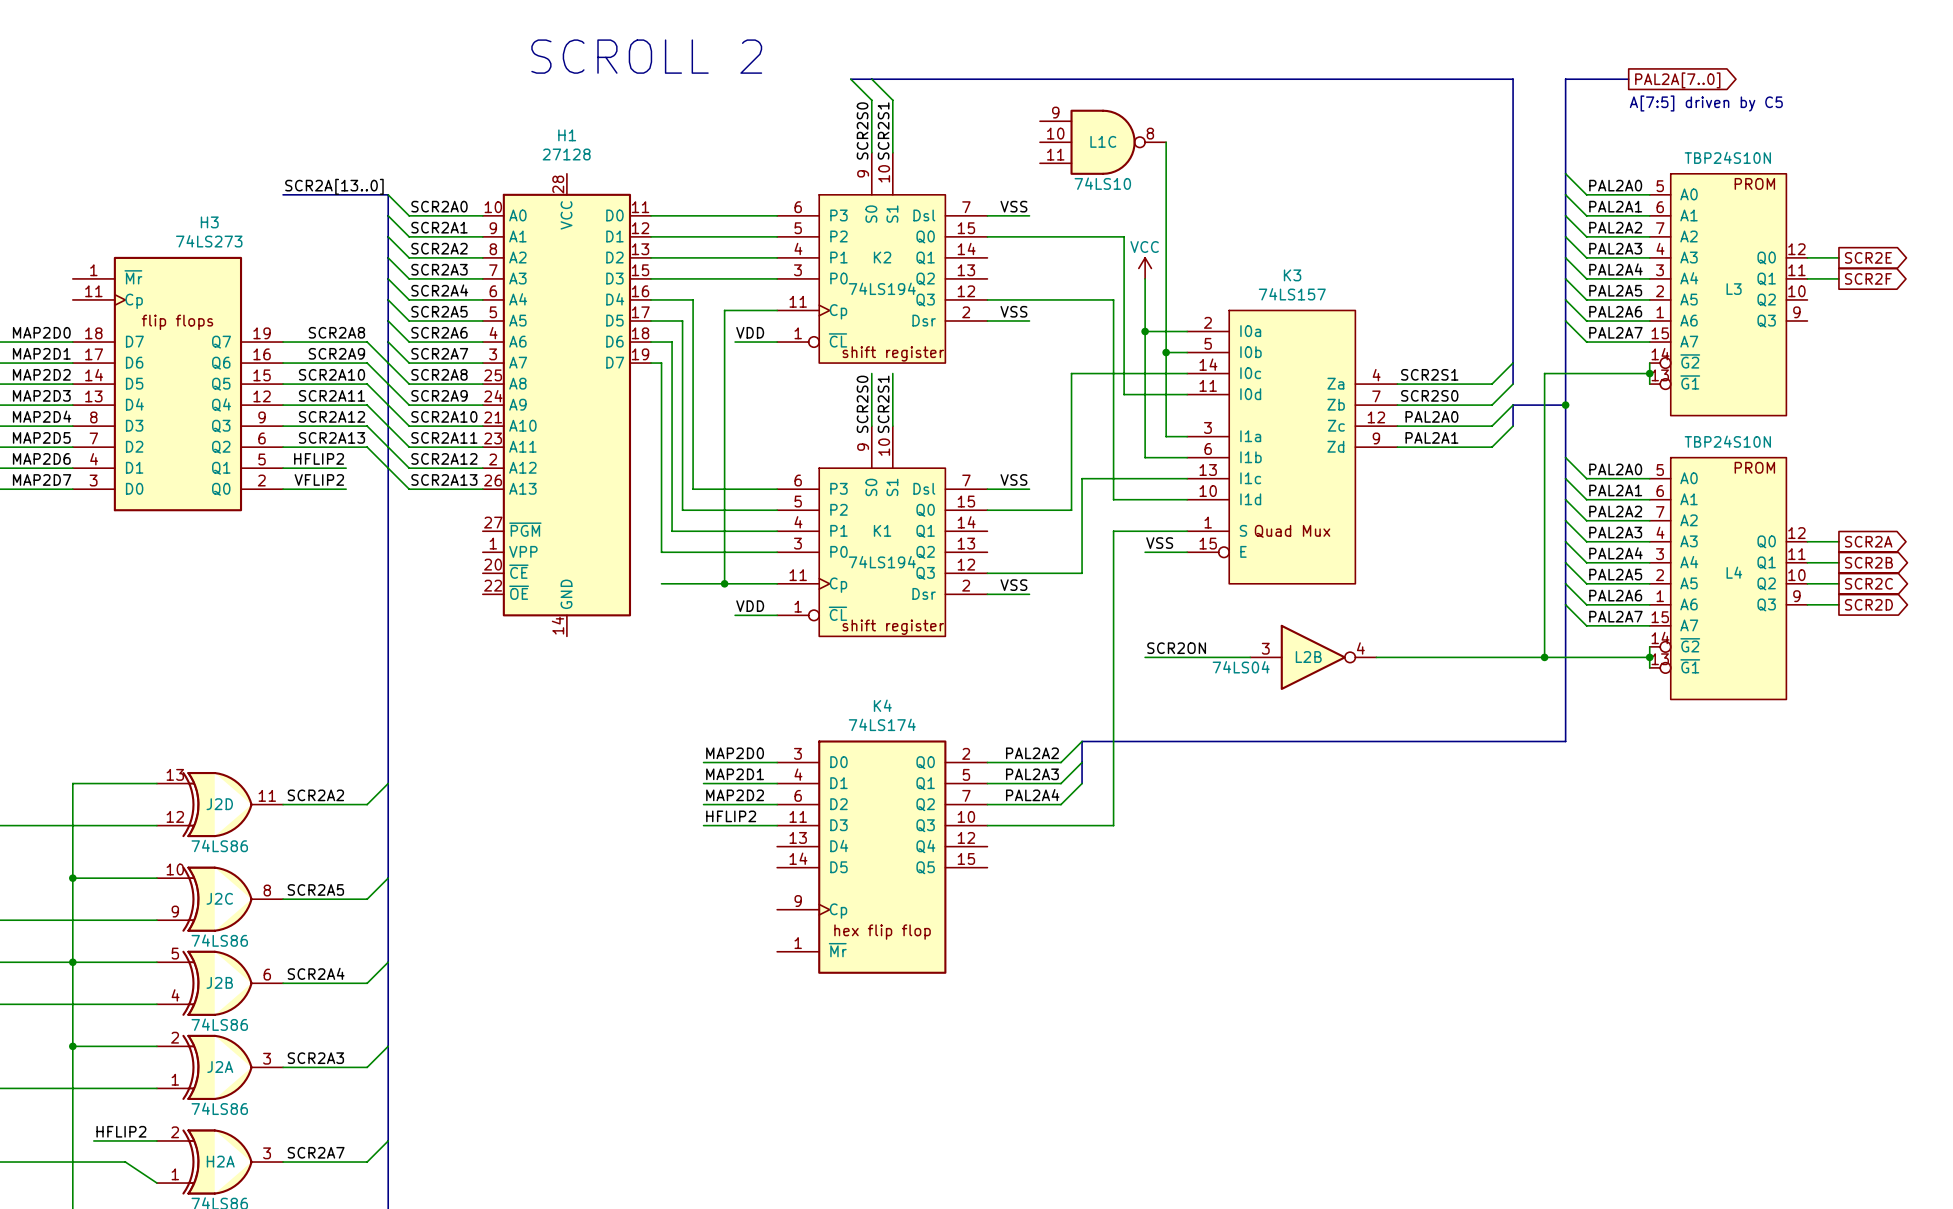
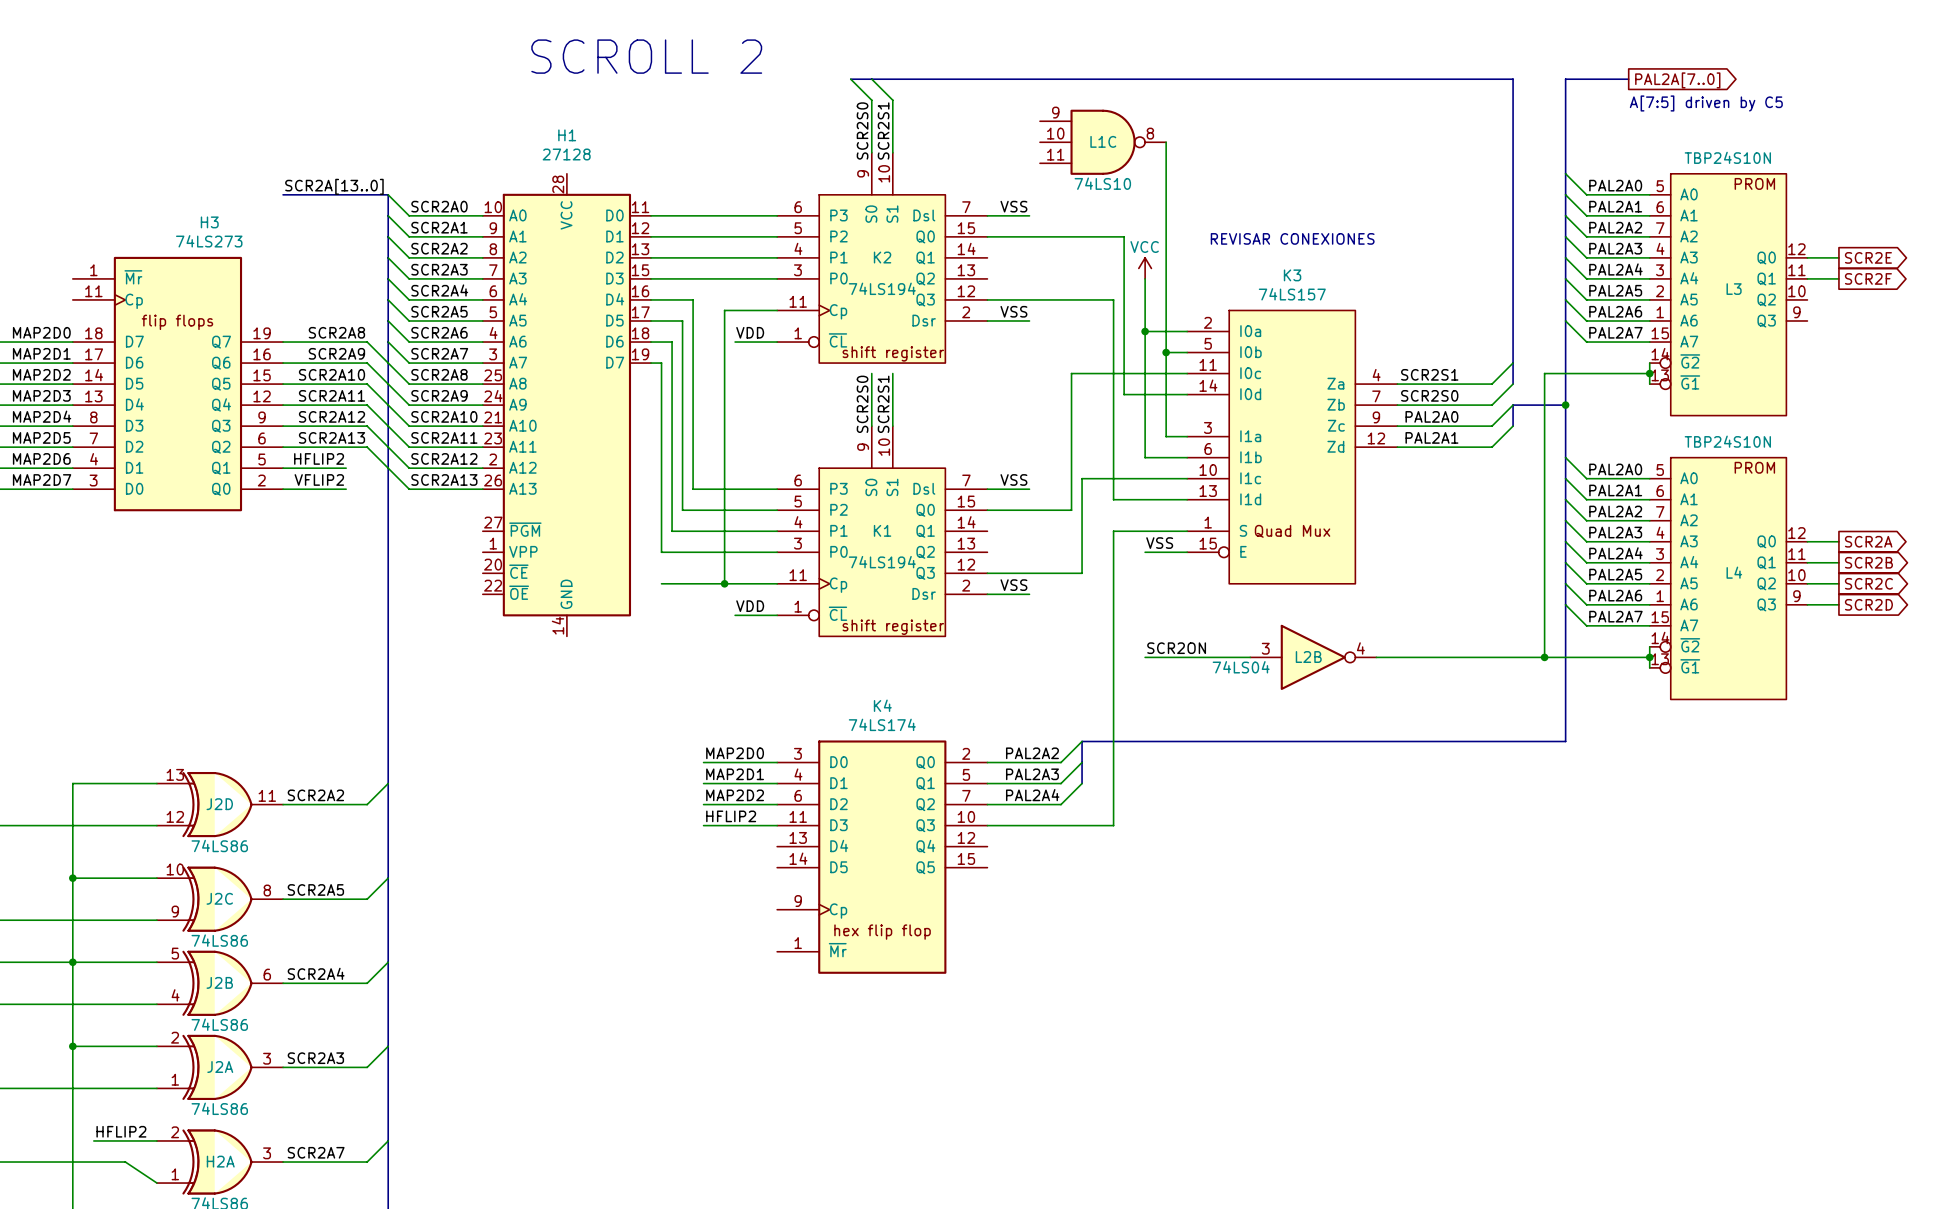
text: none -> REVISAR CONEXIONES (1292, 238)
K3 pin number: 14 (1208, 364) -> 11 (1208, 364)
K3 pin number: 11 (1208, 385) -> 14 (1208, 385)
K3 pin number: 12 (1376, 417) -> 9 (1376, 417)
K3 pin number: 9 (1376, 438) -> 12 (1376, 438)
K3 pin number: 13 (1208, 470) -> 10 (1208, 470)
K3 pin number: 10 (1208, 491) -> 13 (1208, 491)

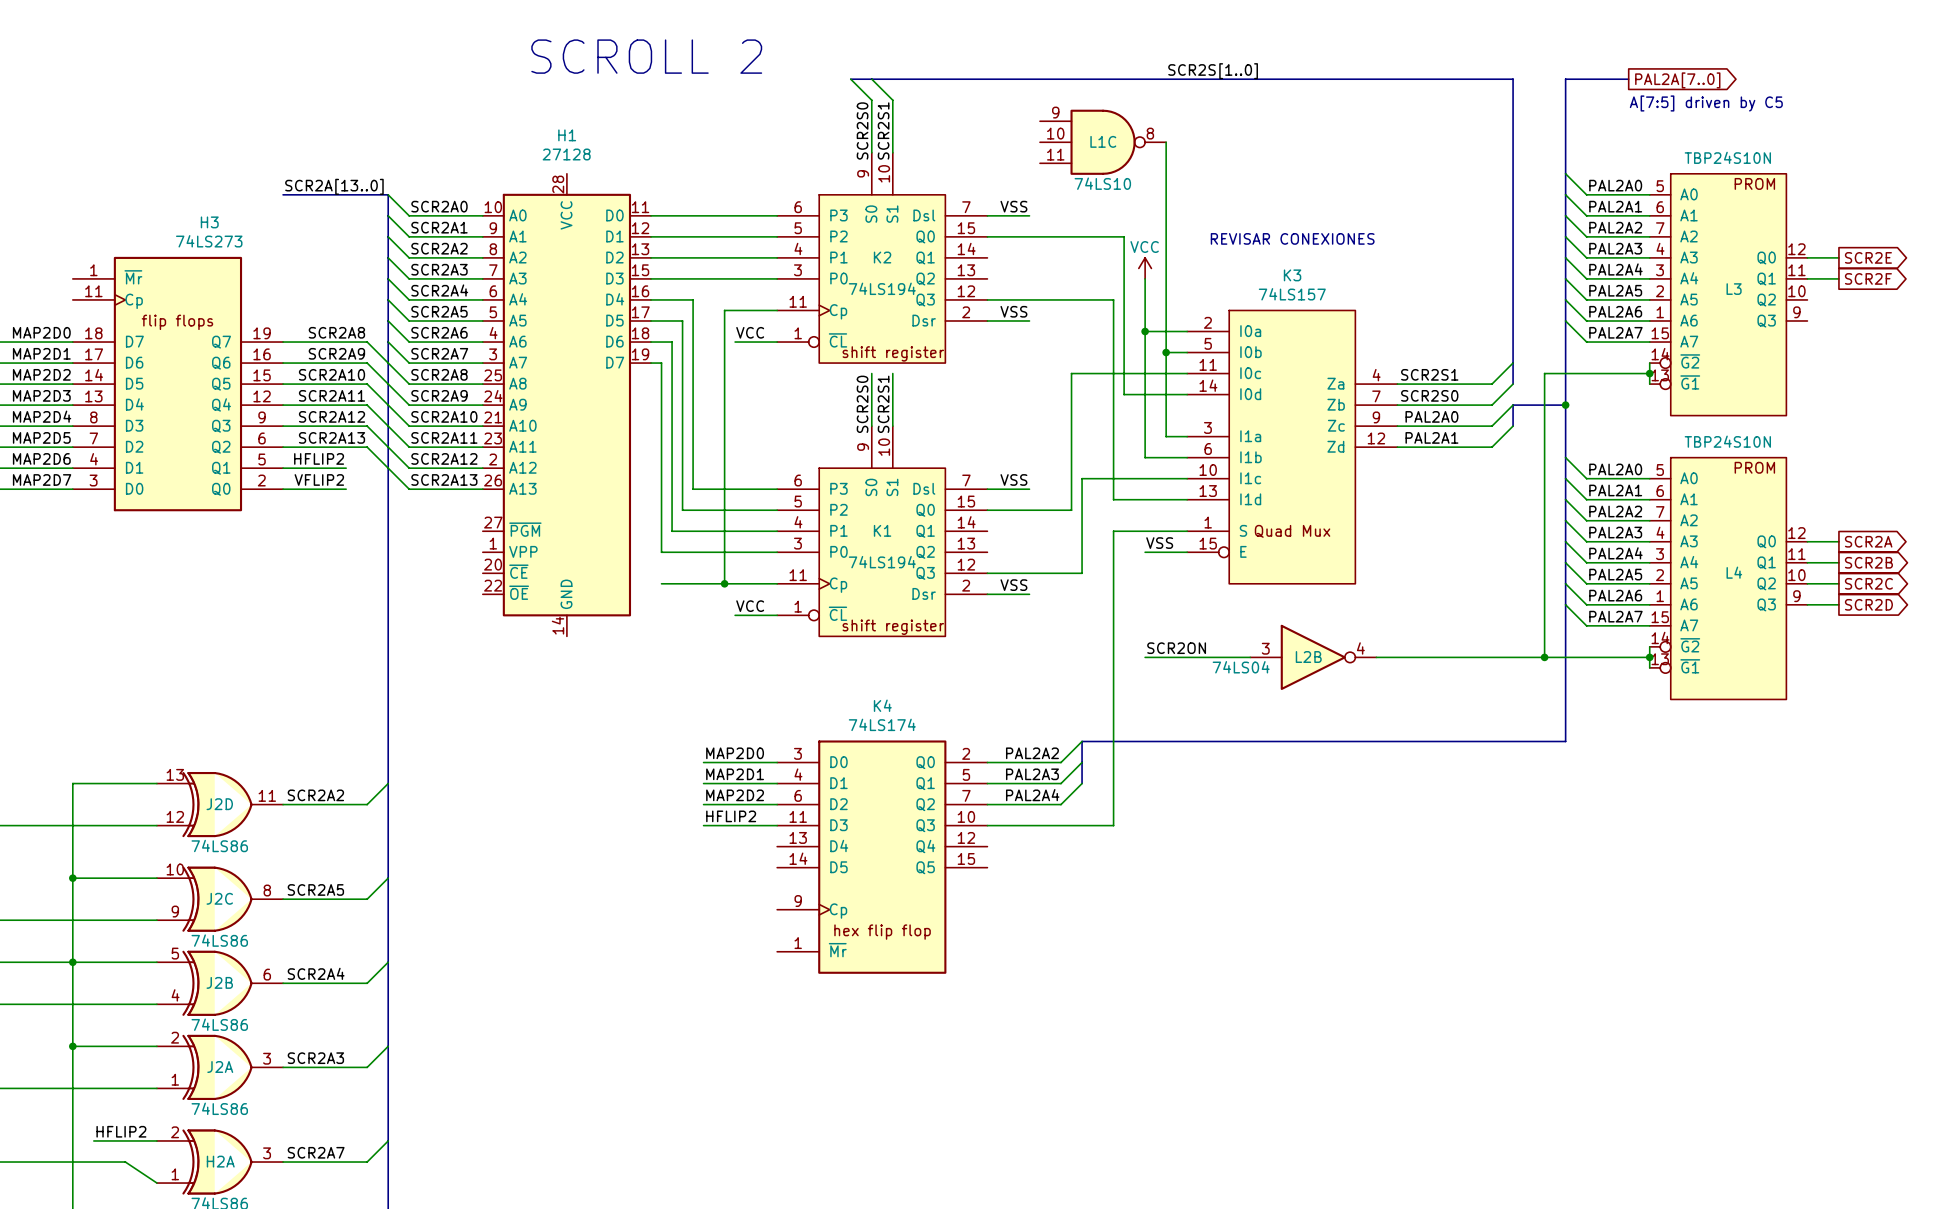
label: none -> SCR2S[1..0] (1213, 71)
label: VDD (750, 332) -> VCC (750, 332)
label: VDD (750, 606) -> VCC (750, 606)

